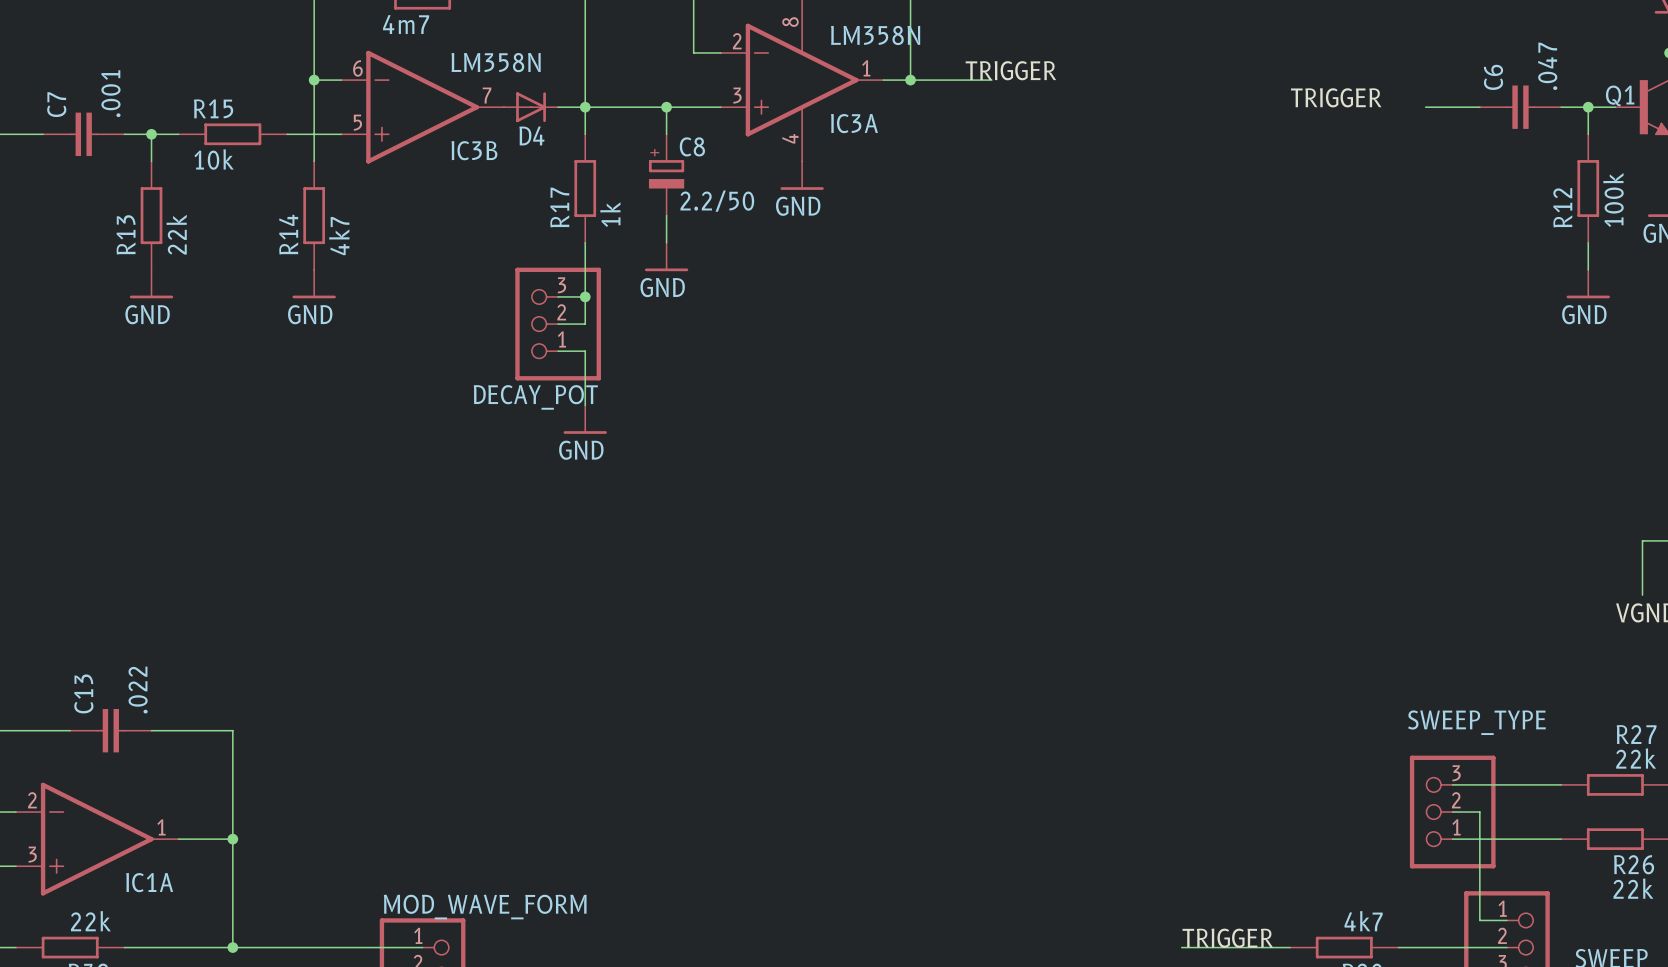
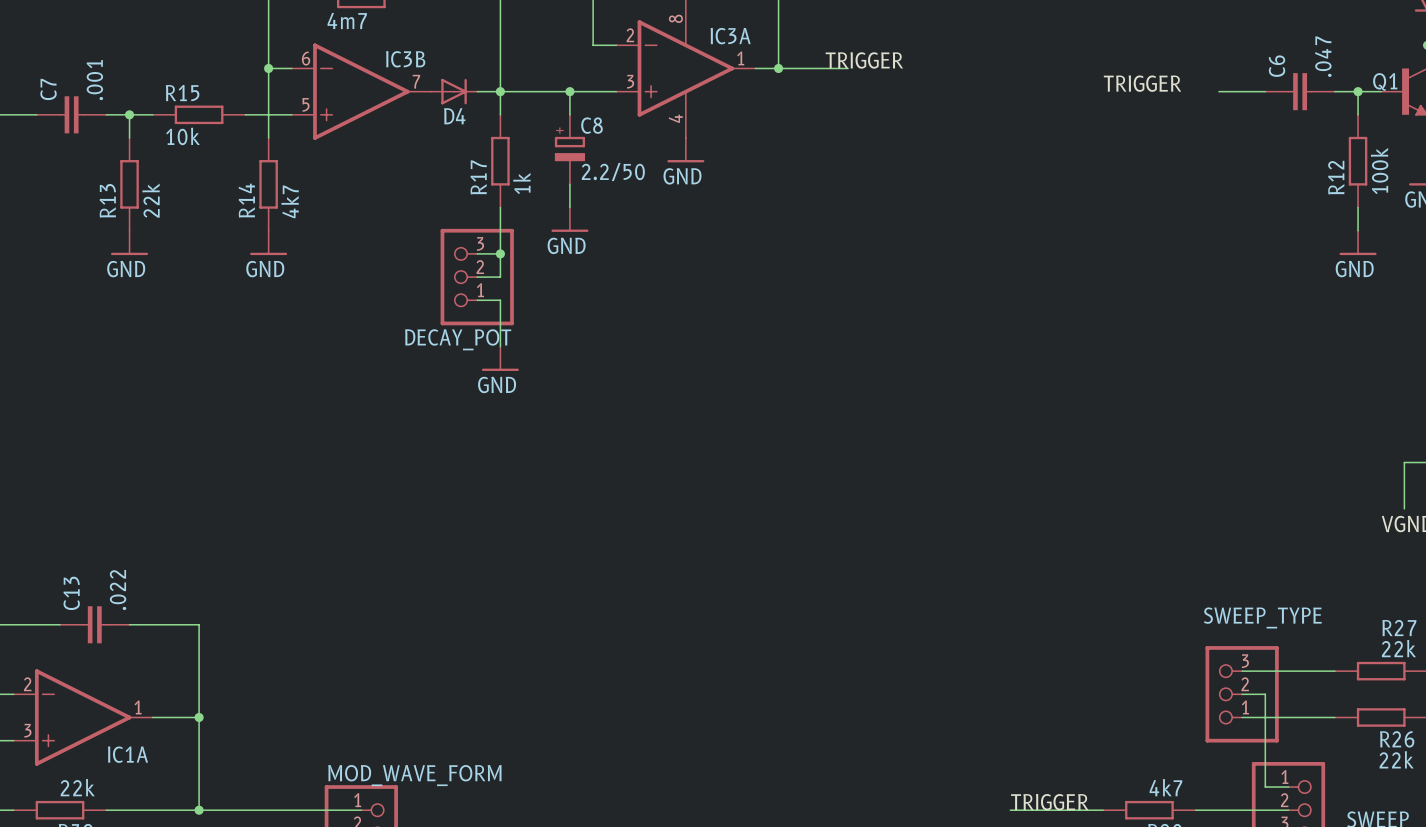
IC3A value: LM358N (875, 35) -> none
IC3B value: LM358N (496, 62) -> none
IC3A name position: IC3A (854, 123) -> IC3A (730, 36)
IC3B name position: IC3B (474, 150) -> IC3B (405, 59)

